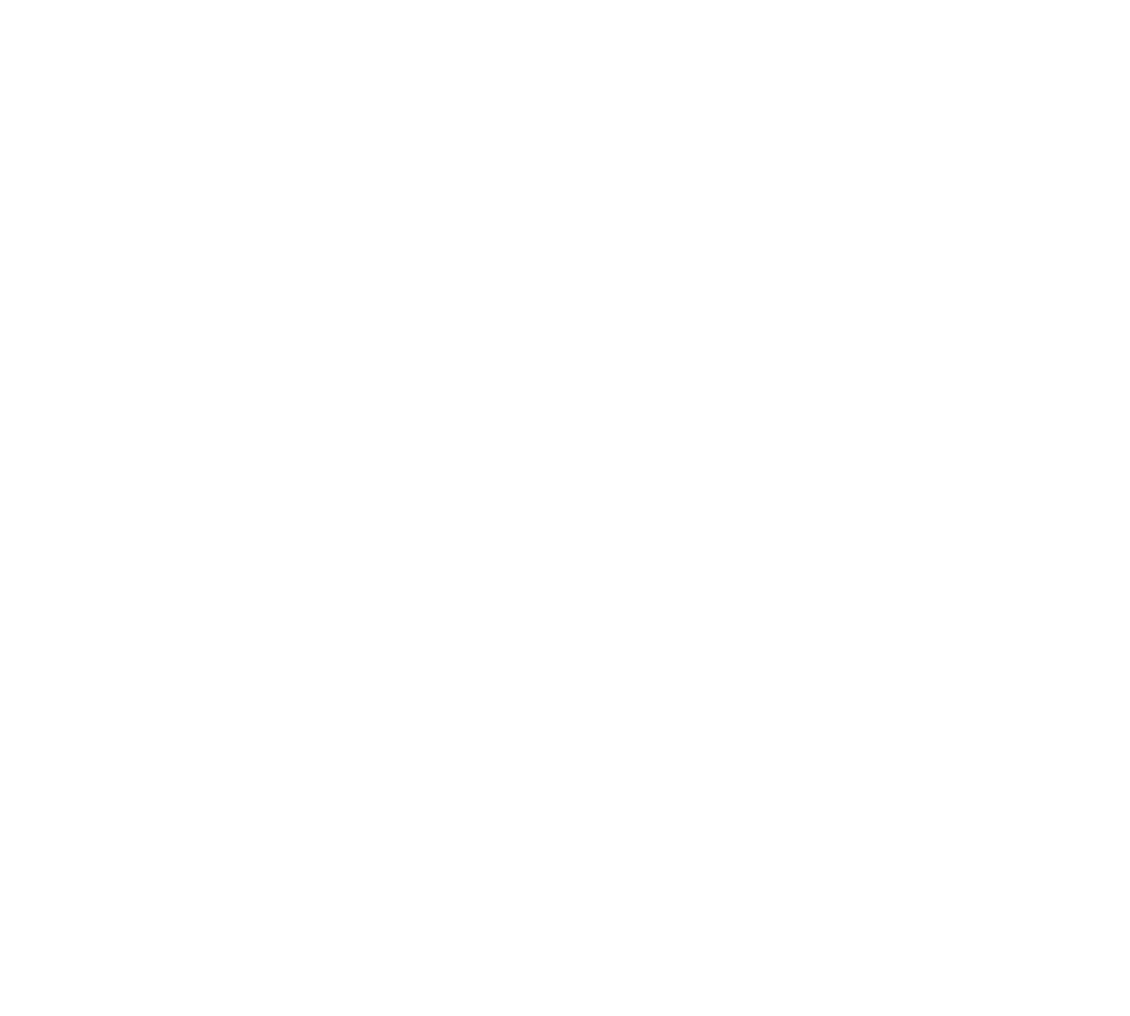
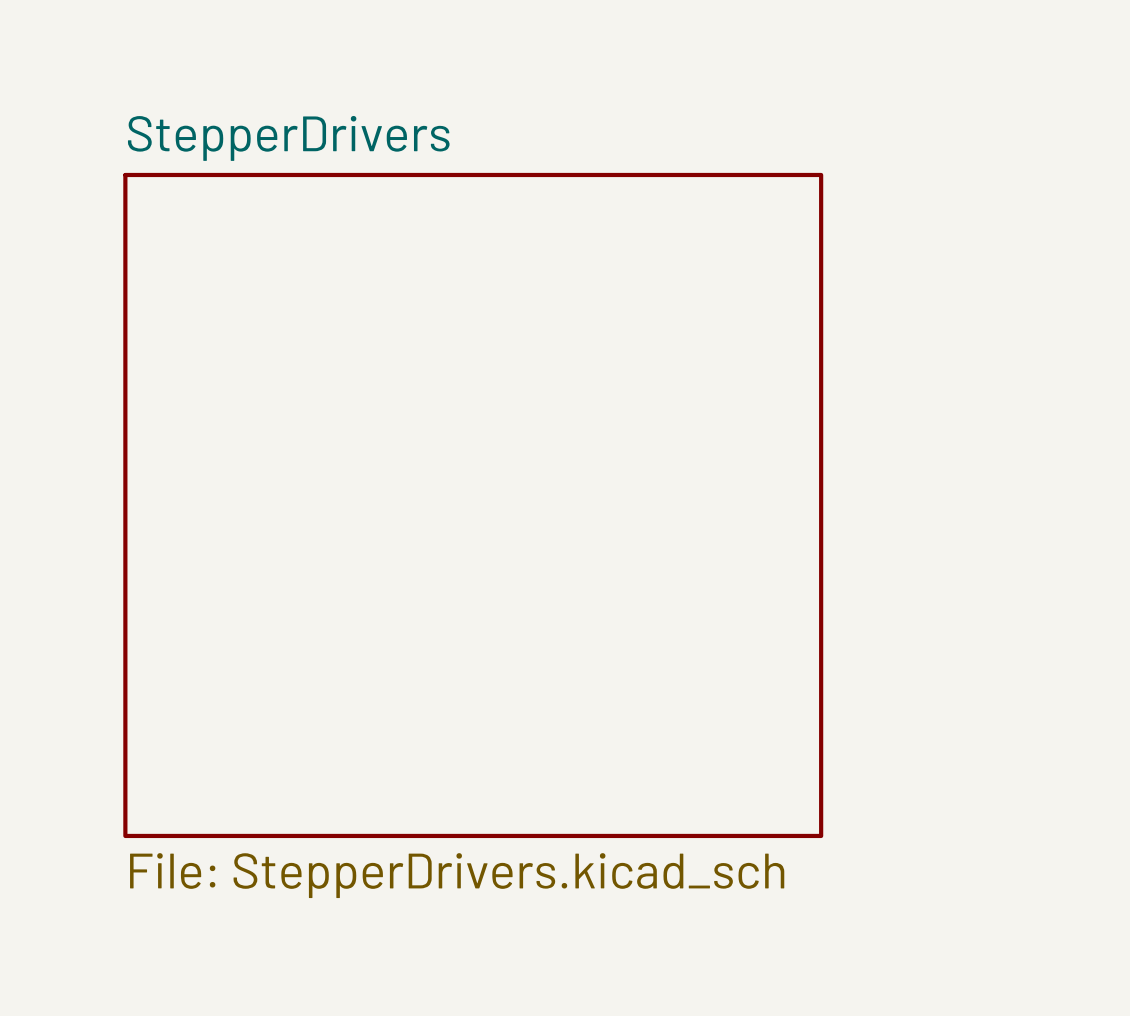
sheet StepperDrivers: none -> File: StepperDrivers.kicad_sch (473, 505)

